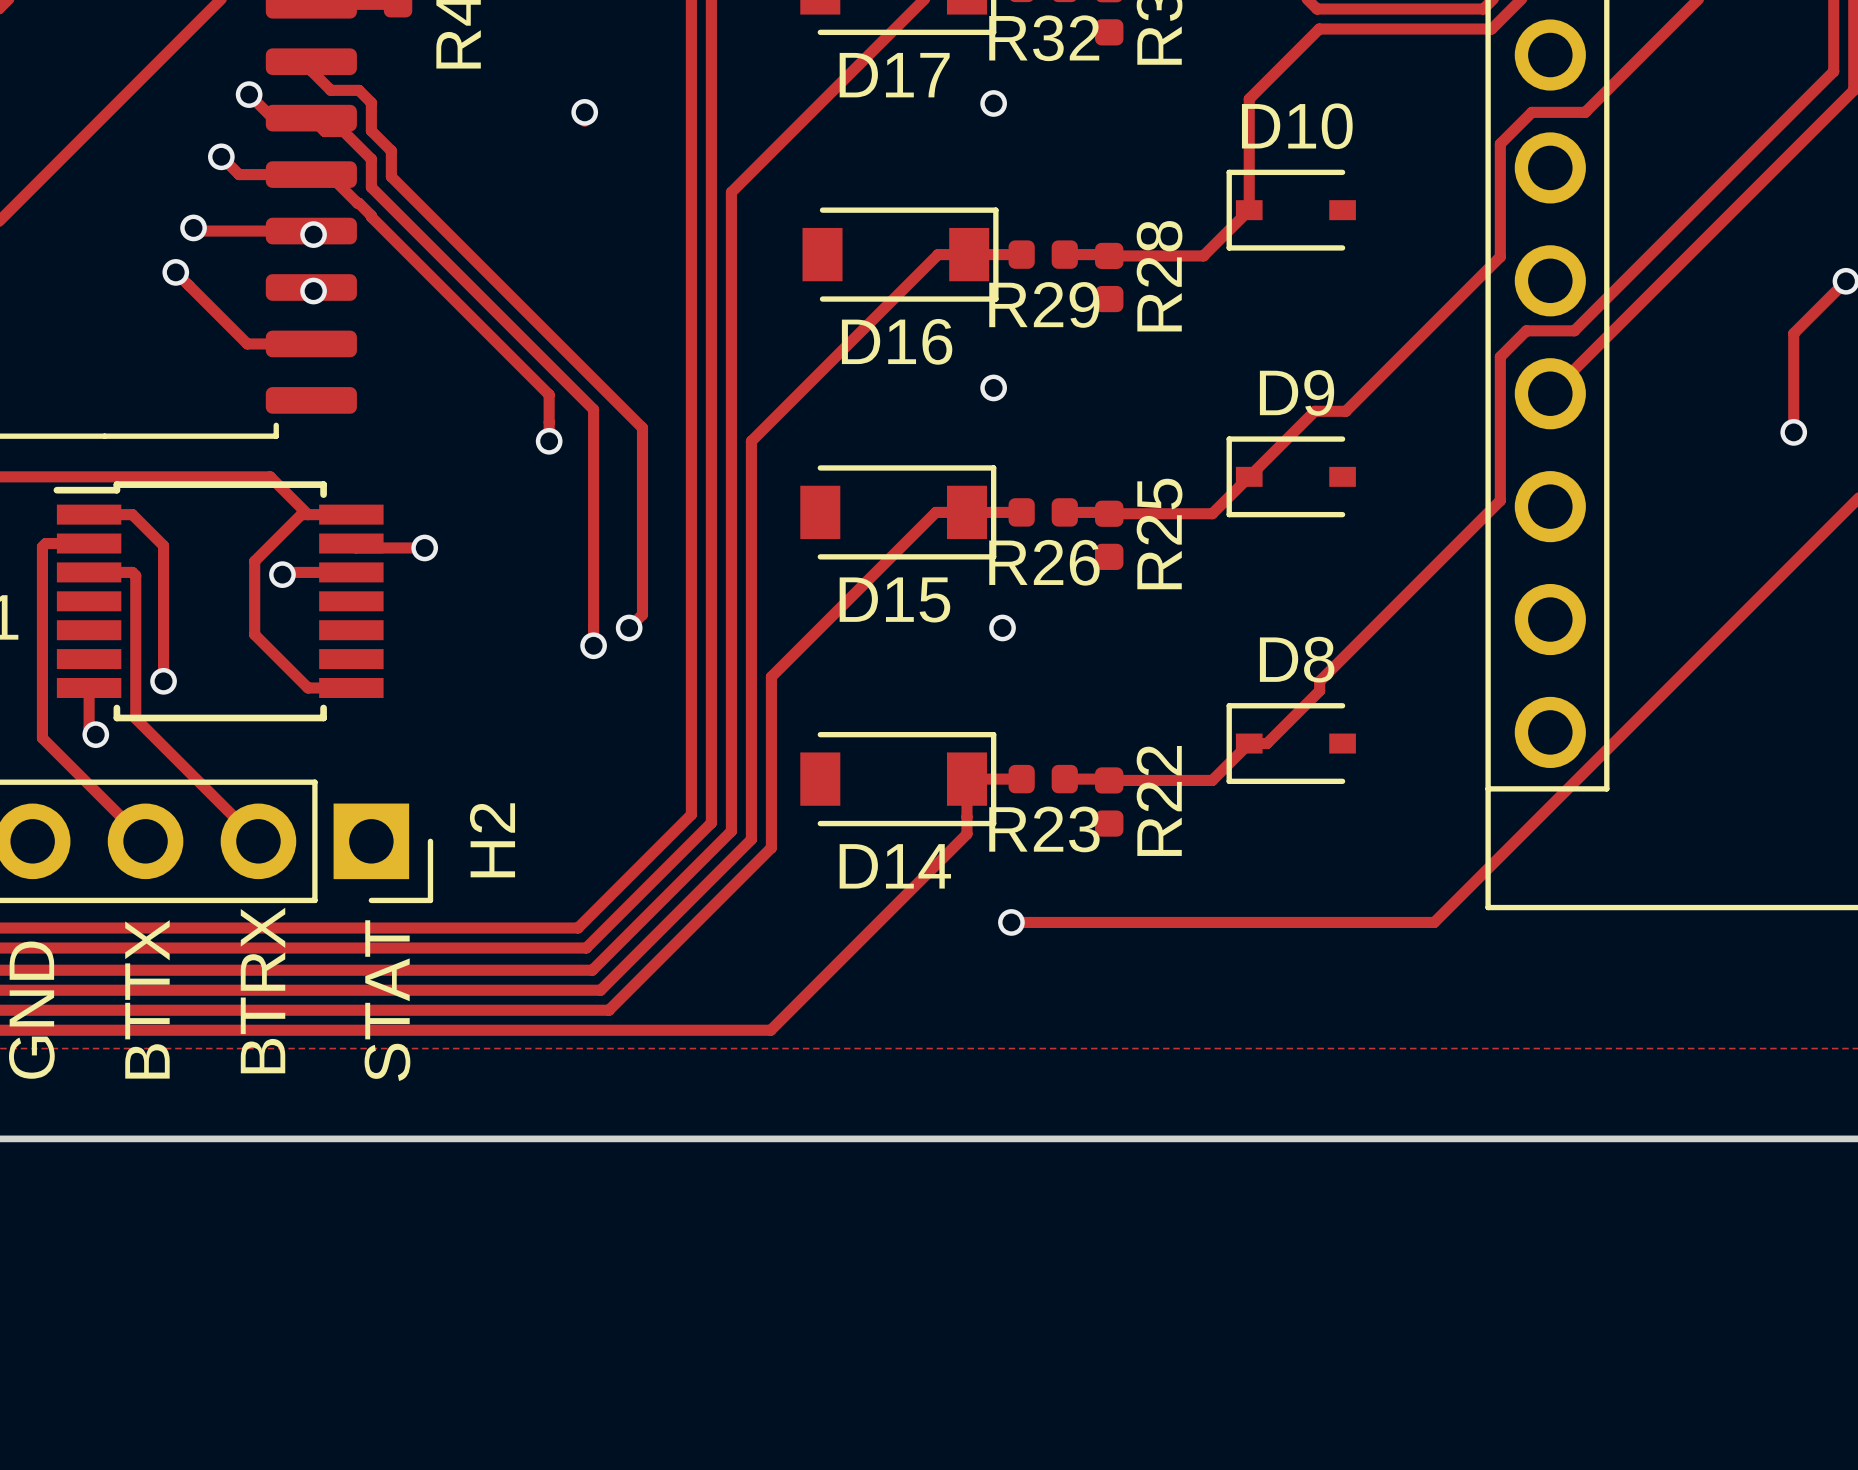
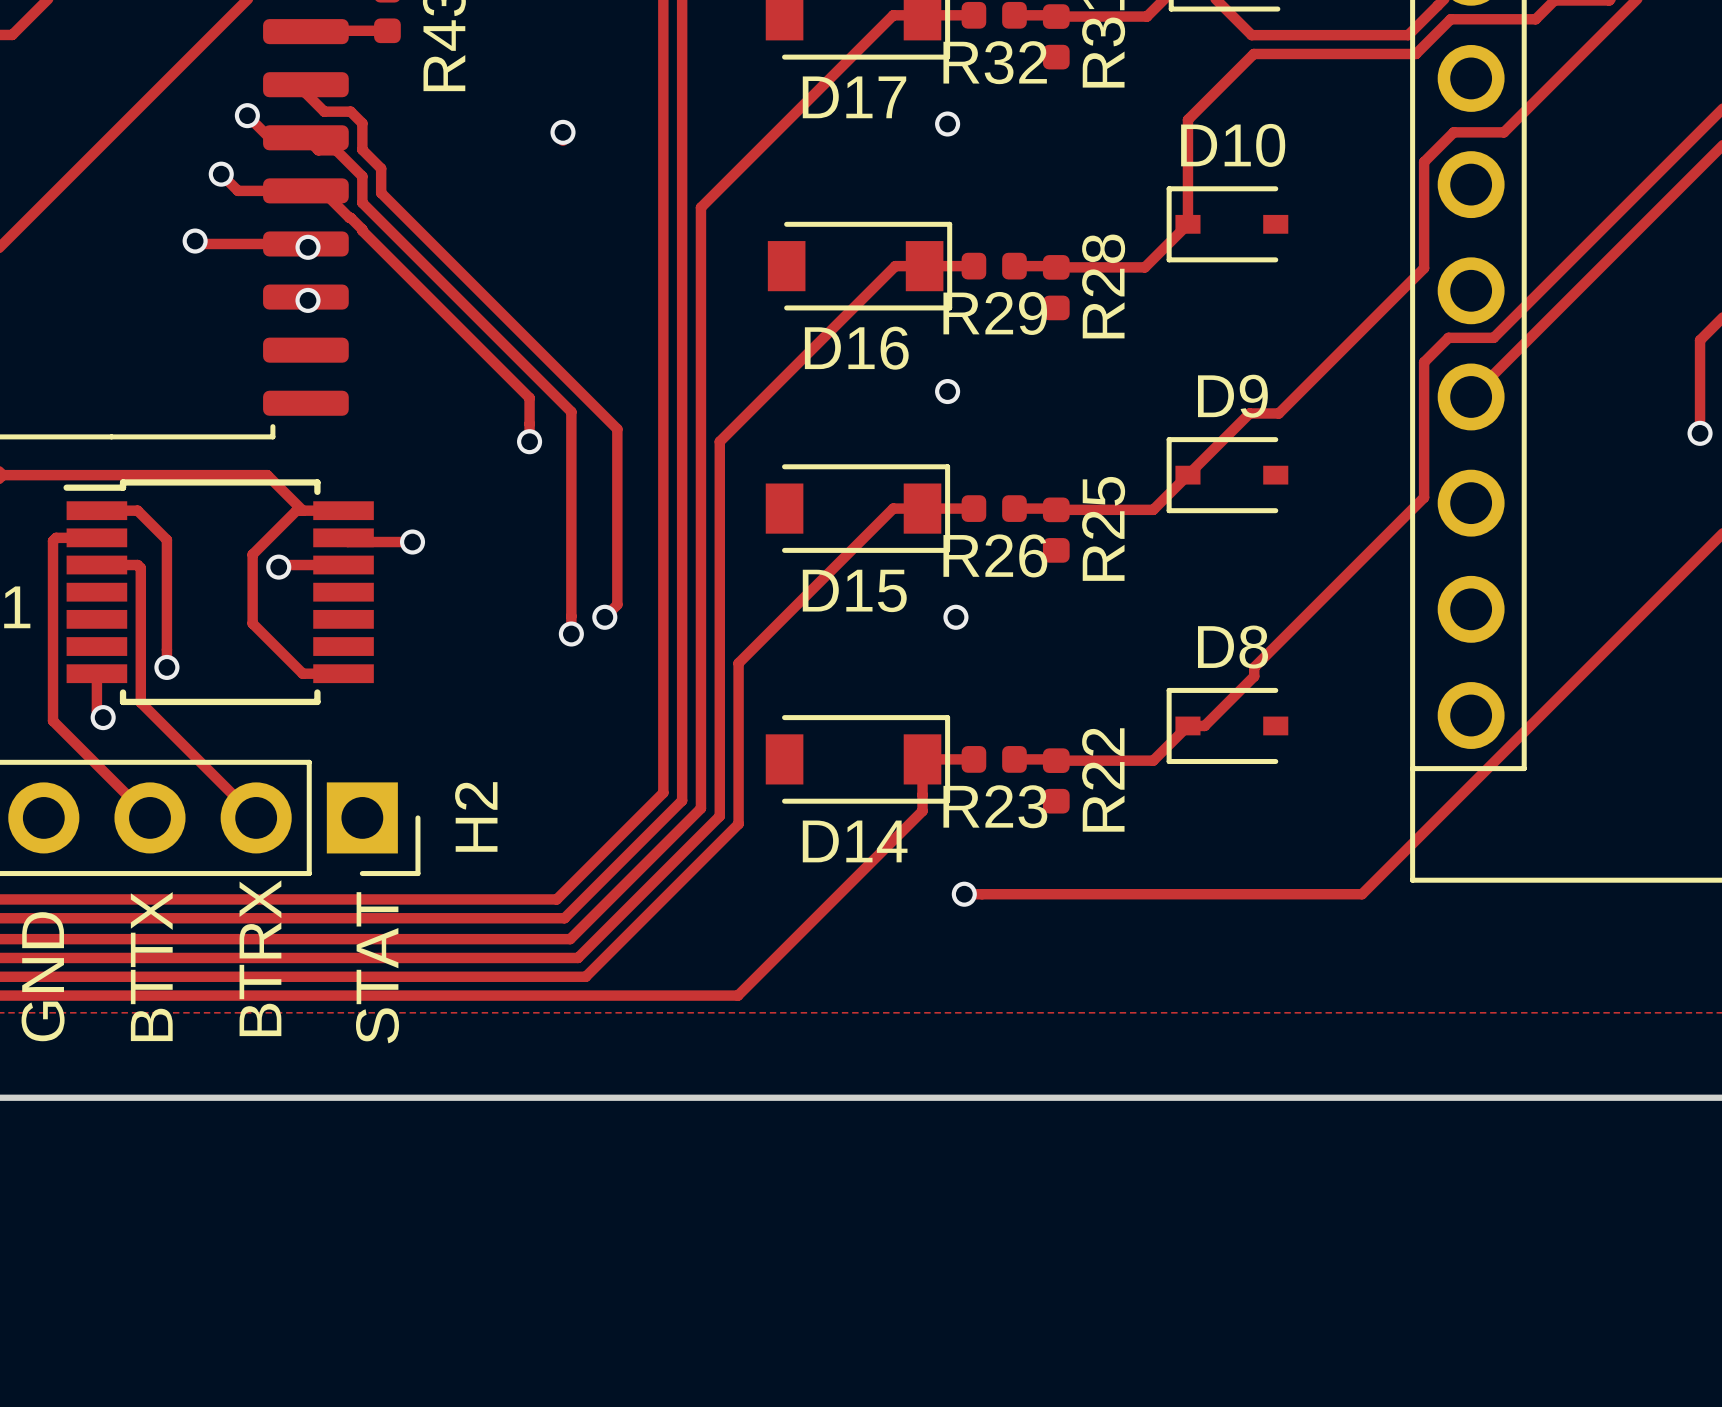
track: (175, 272) (247, 343) (311, 343) -> none
via: (175, 272) -> none

